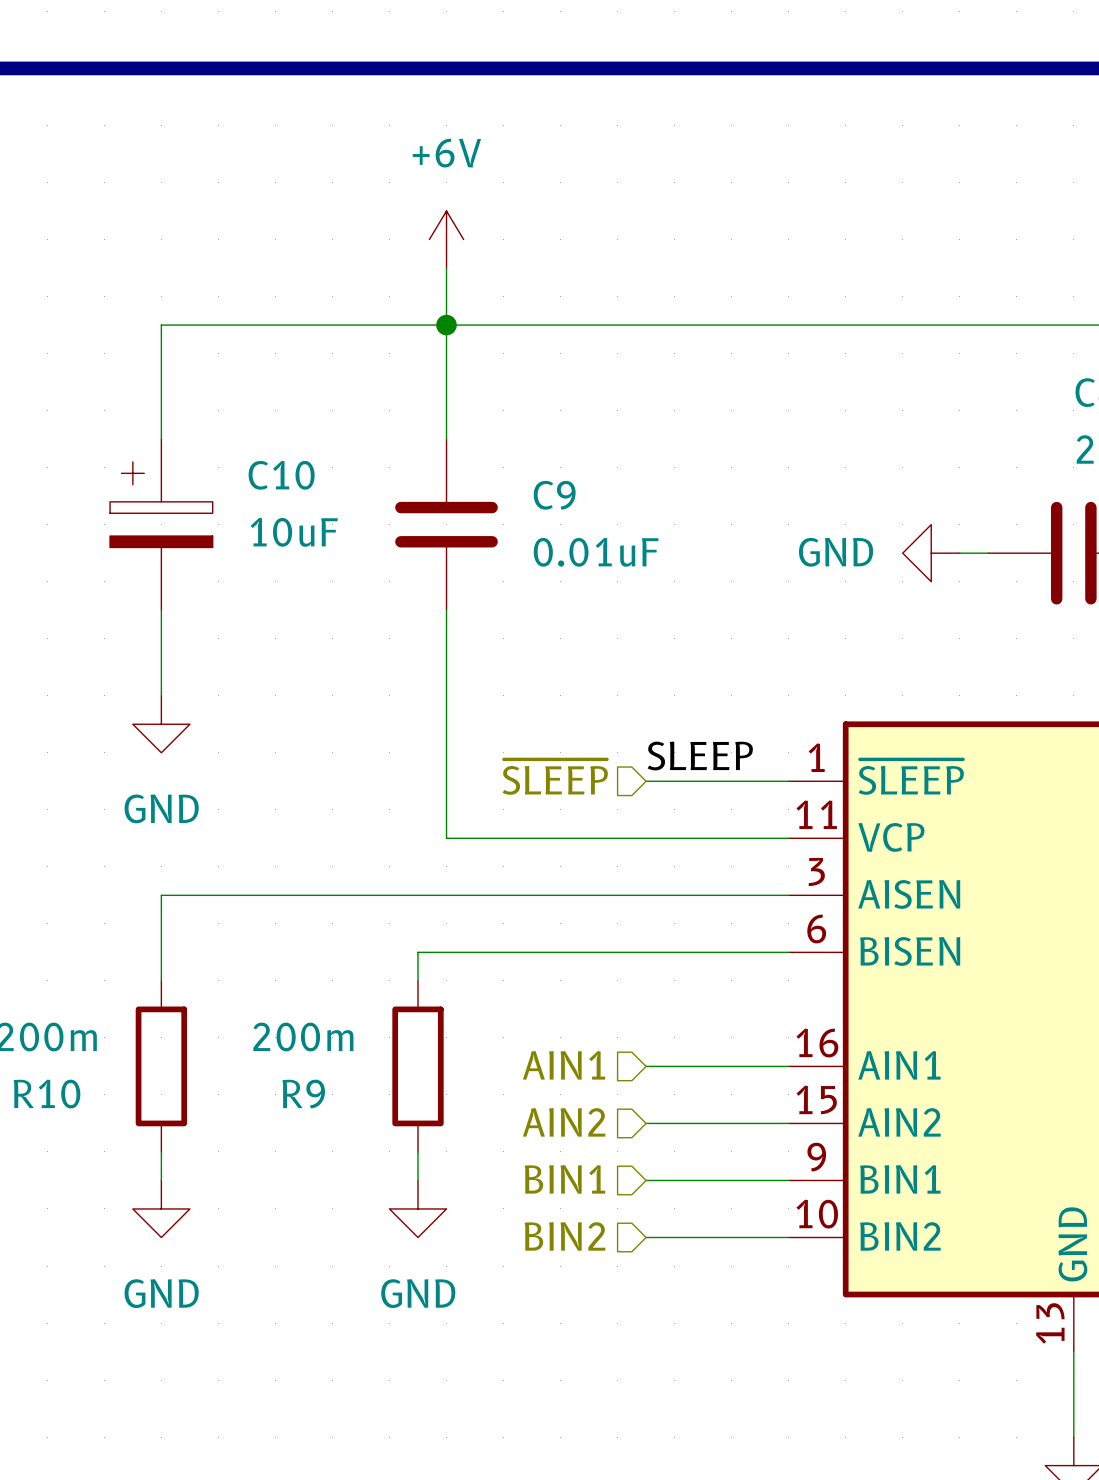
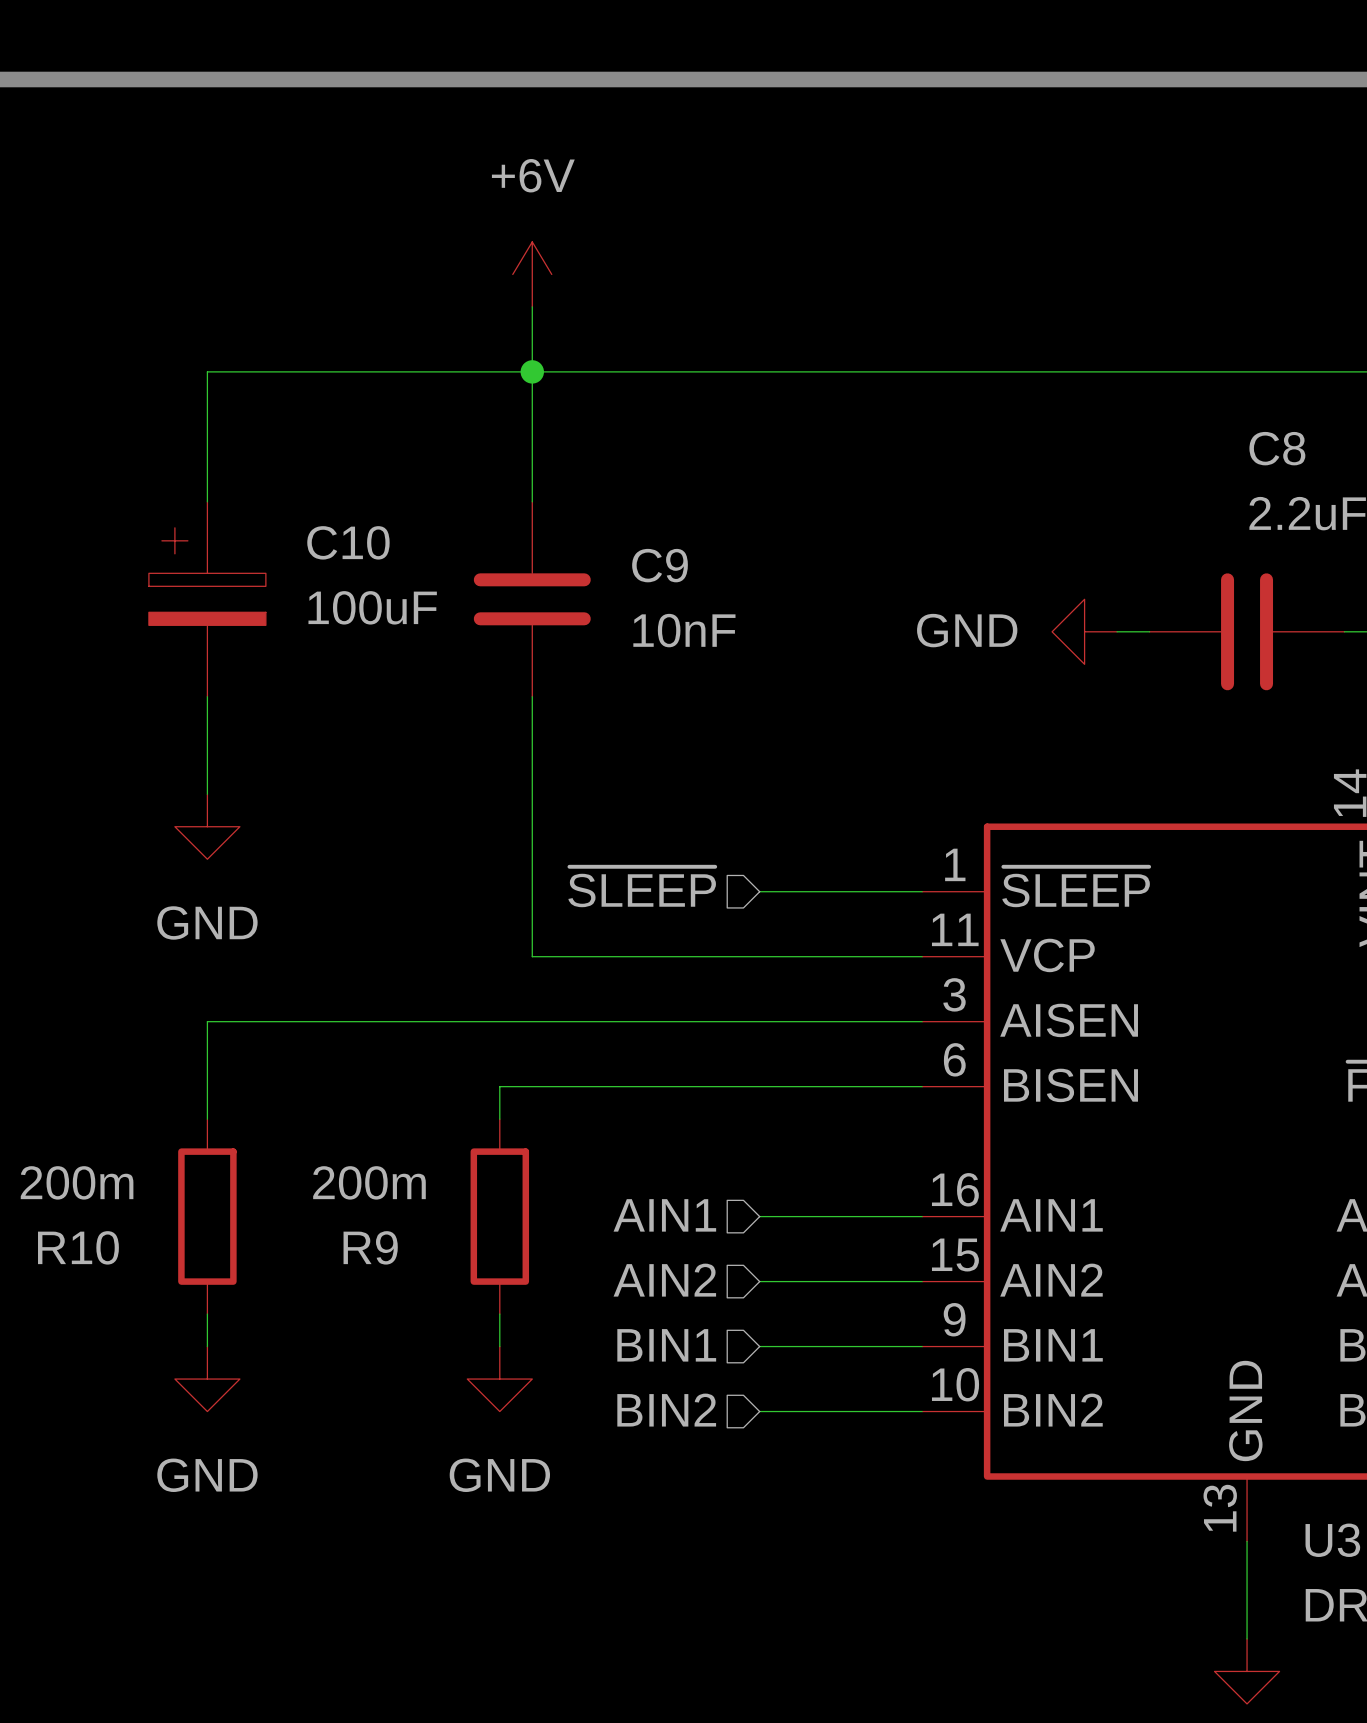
C10 value: 10uF (294, 532) -> 100uF (372, 607)
C9 value: 0.01uF (596, 552) -> 10nF (684, 630)
label: SLEEP (700, 755) -> none

